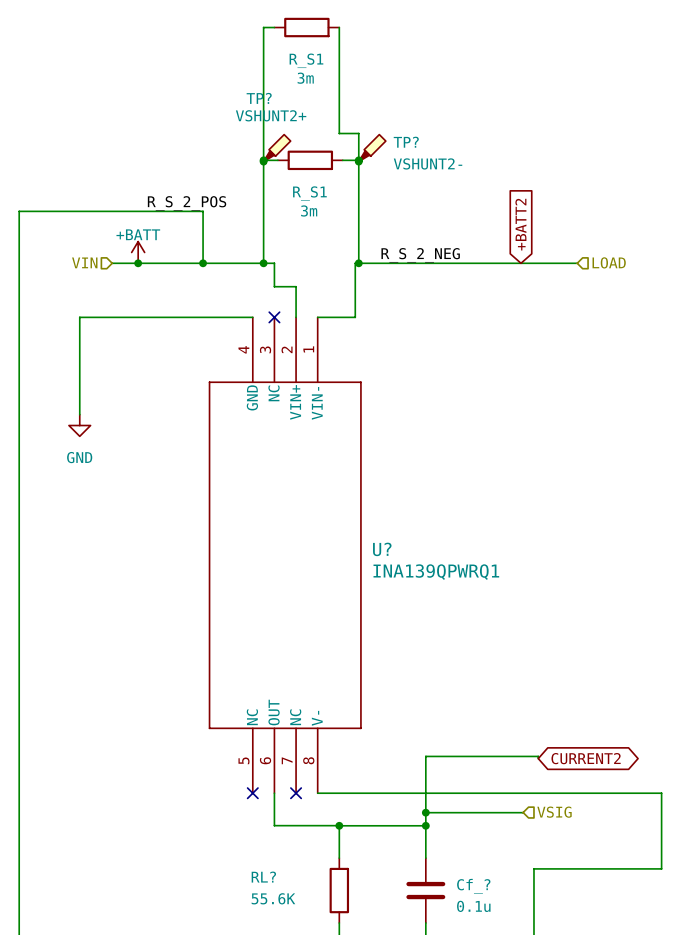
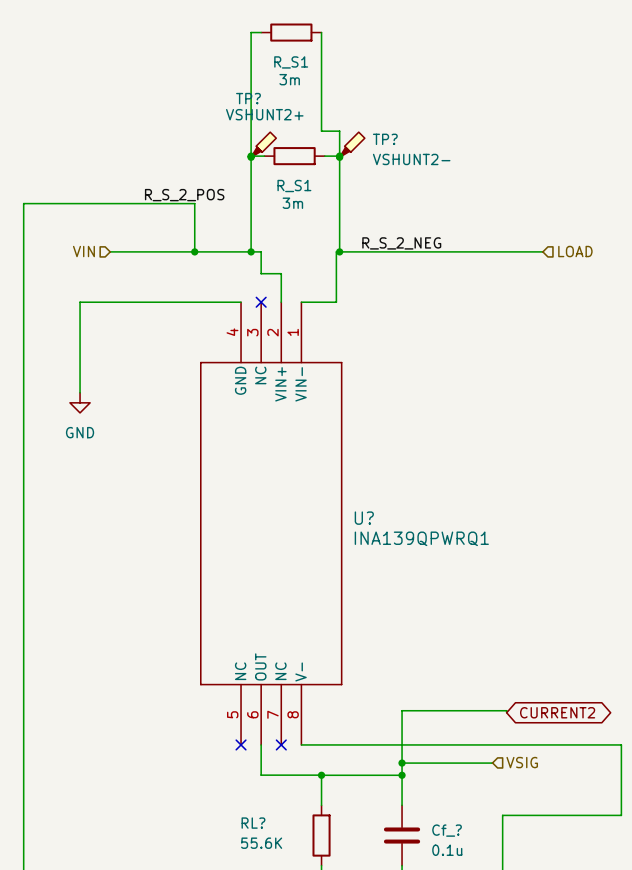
global label: +BATT2 (520, 224) -> none
power symbol: +BATT (138, 252) -> none
junction: (138, 263) -> none

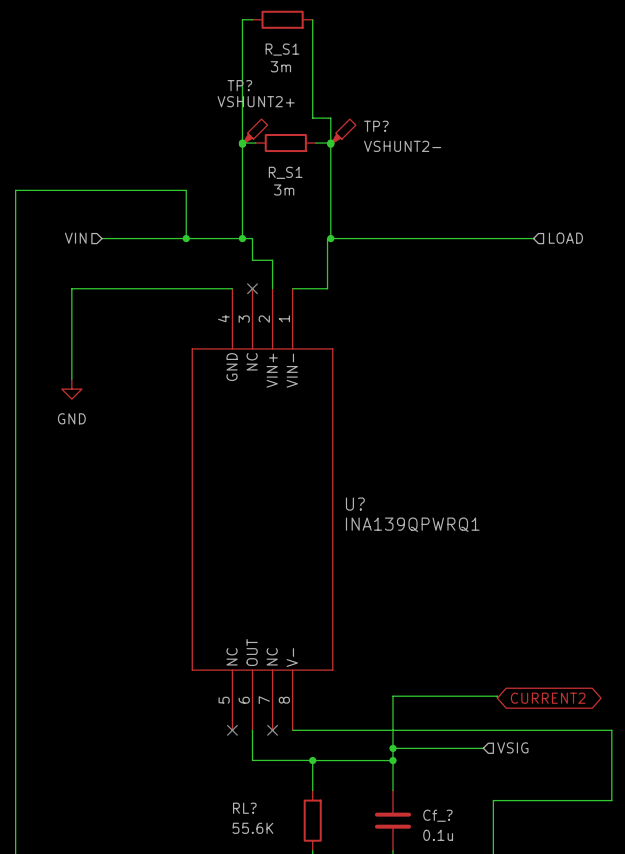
label: R_S_2_POS (184, 195) -> none
label: R_S_2_NEG (401, 243) -> none

